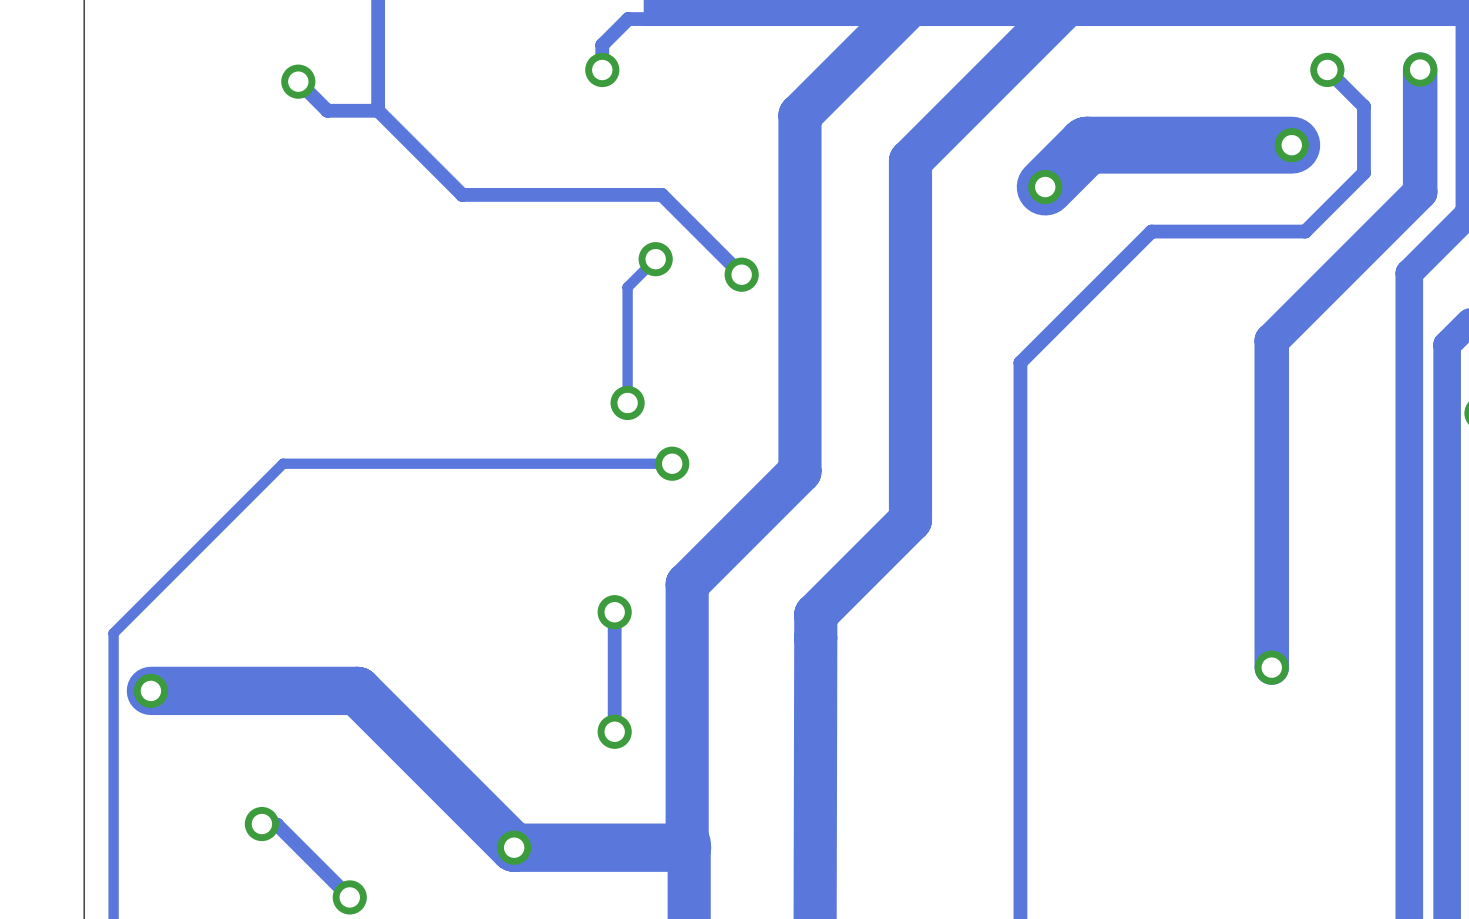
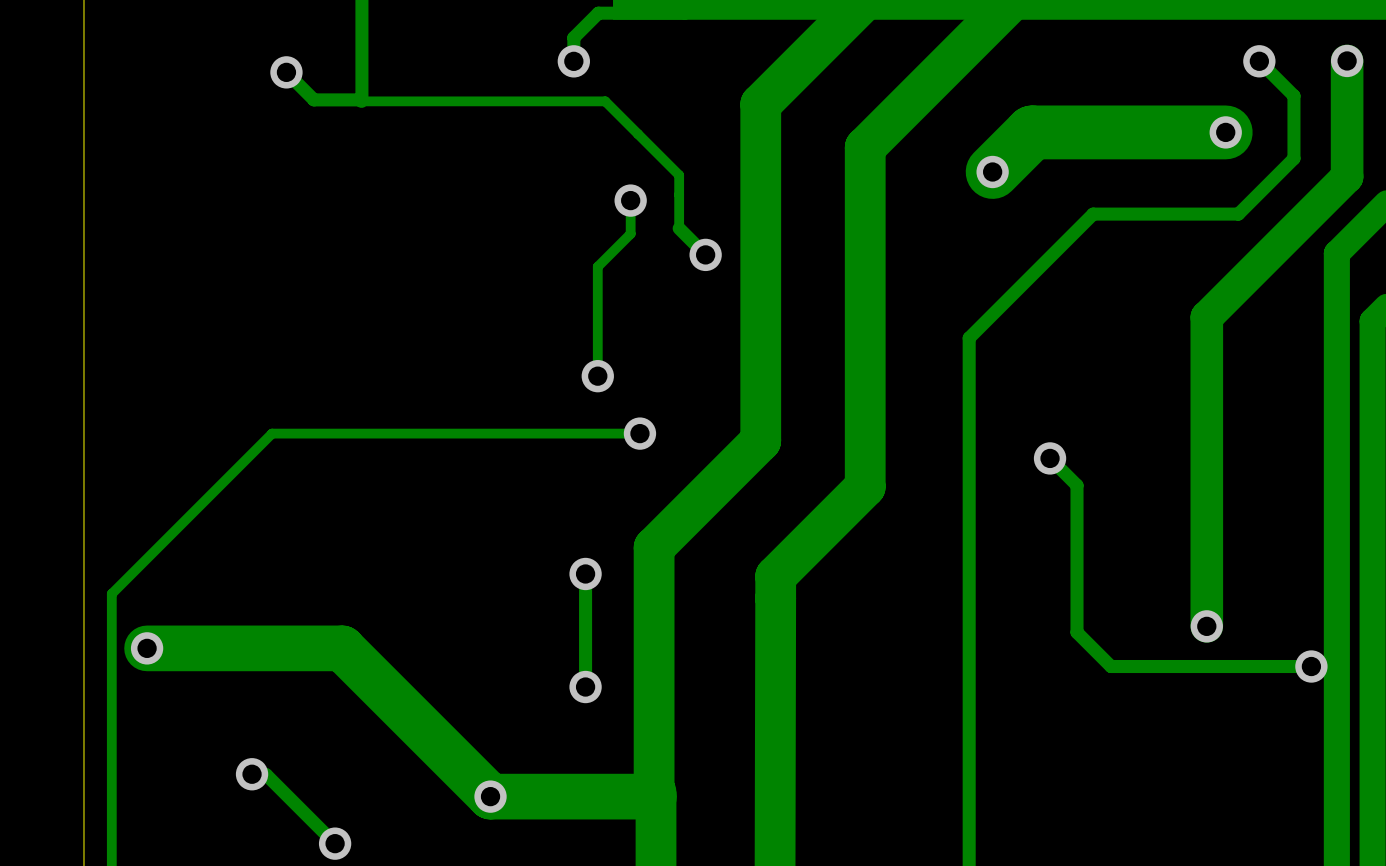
track: (378, 110) (462, 194) (661, 194) (713, 246) -> (361, 100) (605, 101) (679, 175) (679, 228)
track: none -> (630, 200) (630, 233) (624, 240)
via position: (655, 259) -> (630, 200)
track: none -> (1050, 458) (1077, 485) (1077, 632) (1111, 666) (1311, 666)
via: none -> (1050, 458)
via: none -> (1311, 666)

